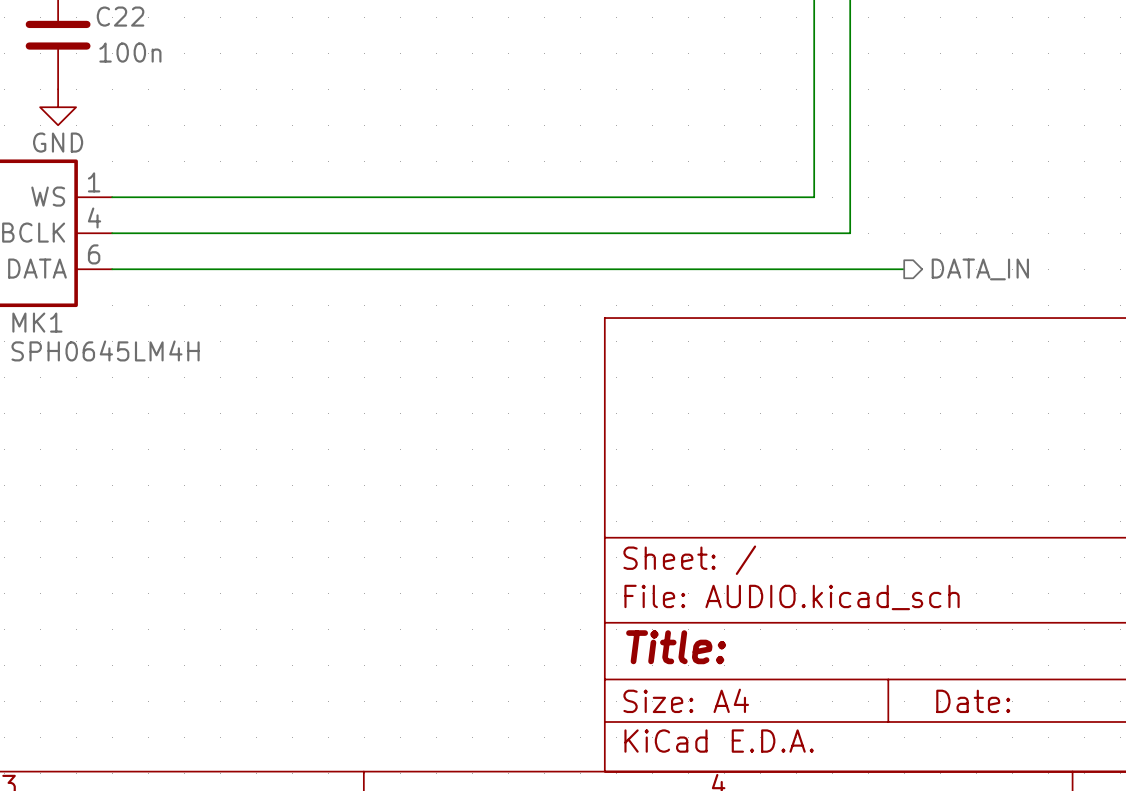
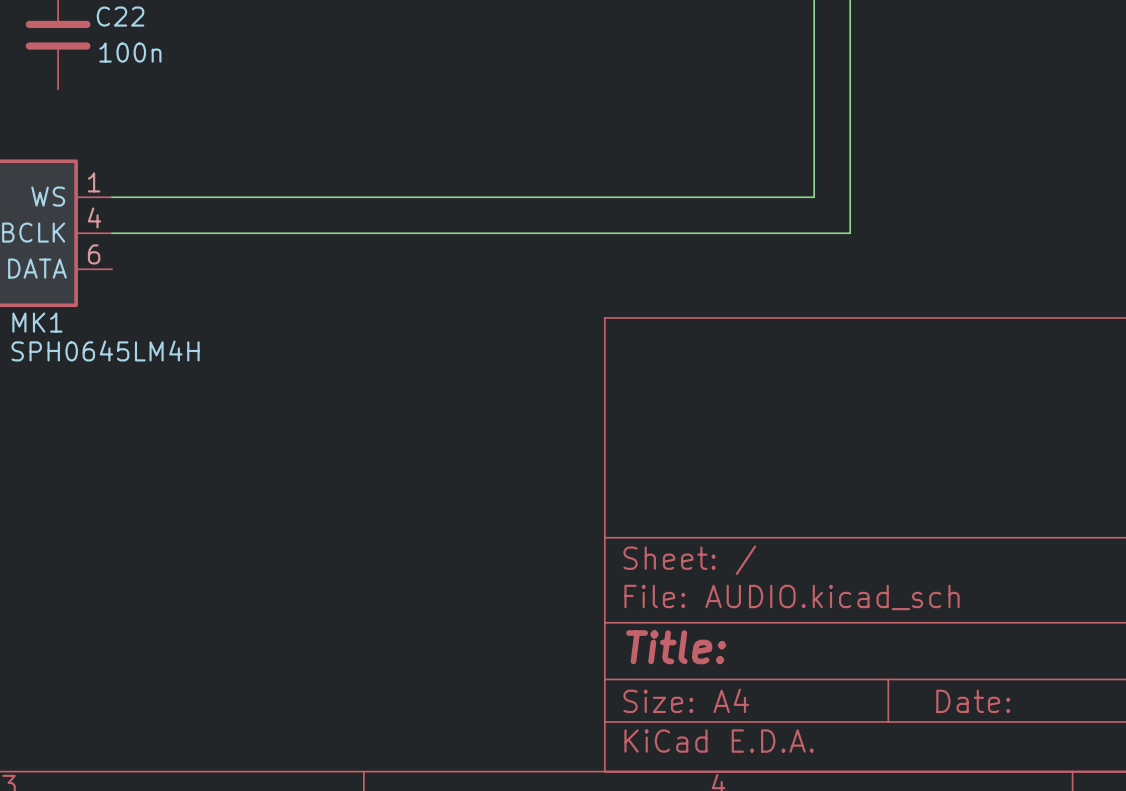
power symbol: GND (58, 107) -> none
wire: (112, 269) (904, 269) -> none
hierarchical label: DATA_IN (980, 269) -> none

